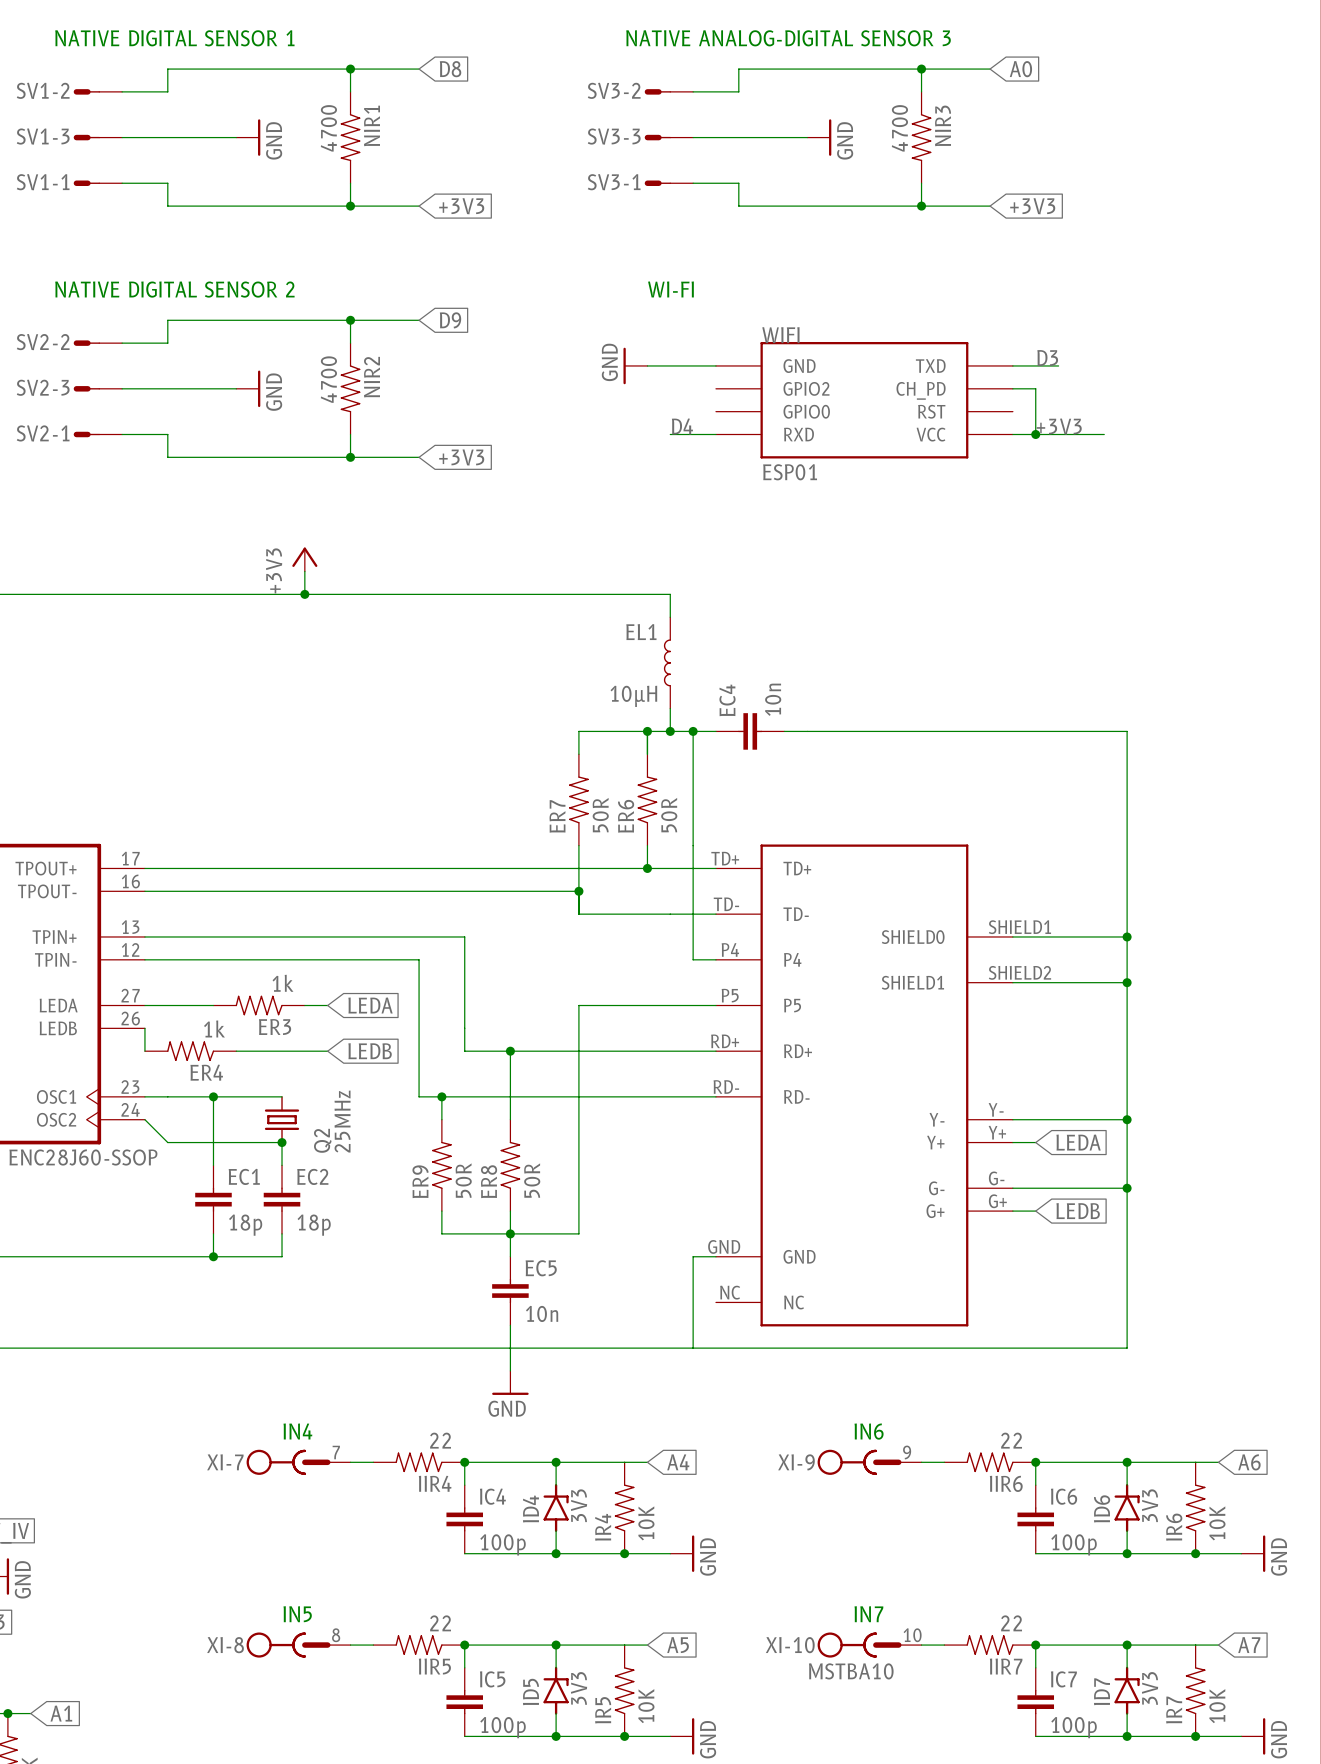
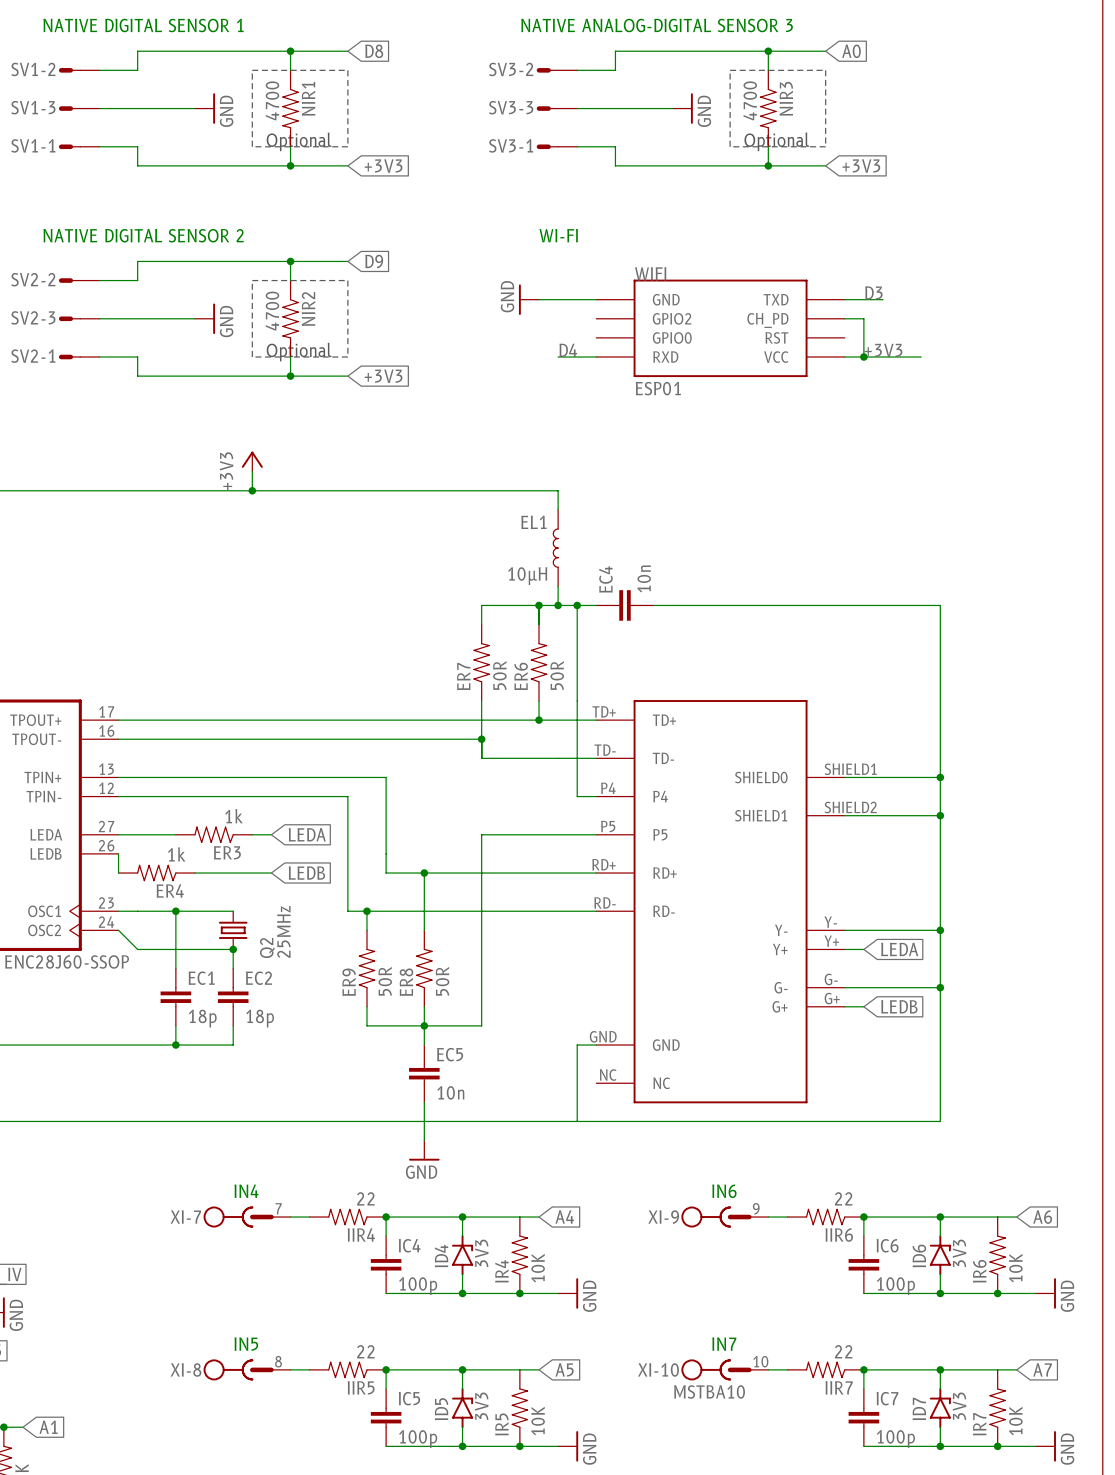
line: none -> (252, 70) (347, 70) (347, 146) (252, 146) (252, 70)
line: none -> (730, 70) (825, 70) (825, 146) (730, 146) (730, 70)
text: none -> Optional (299, 141)
text: none -> Optional (776, 141)
line: none -> (252, 280) (252, 357) (347, 357) (347, 280) (252, 280)
text: none -> Optional (299, 352)

